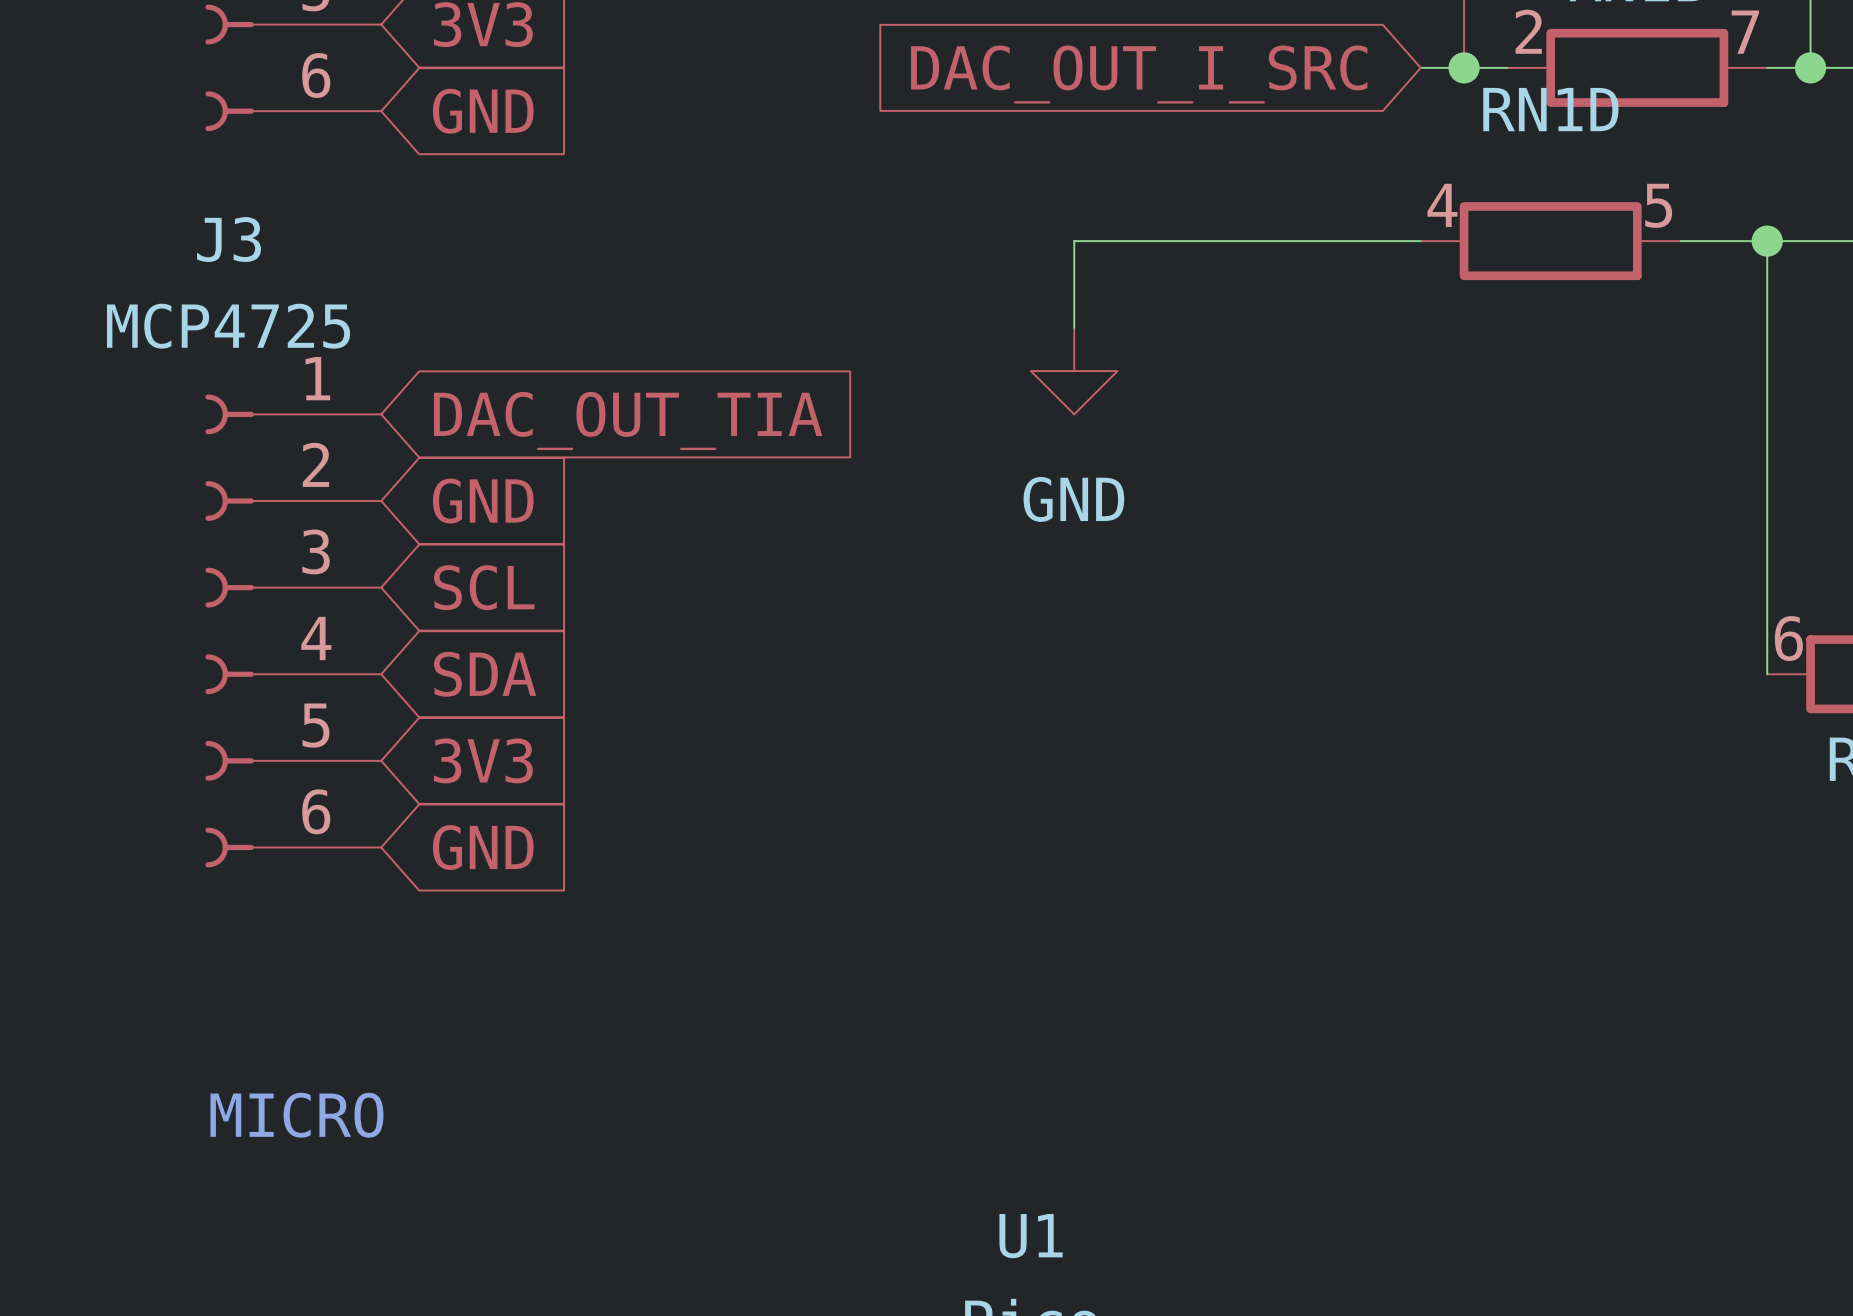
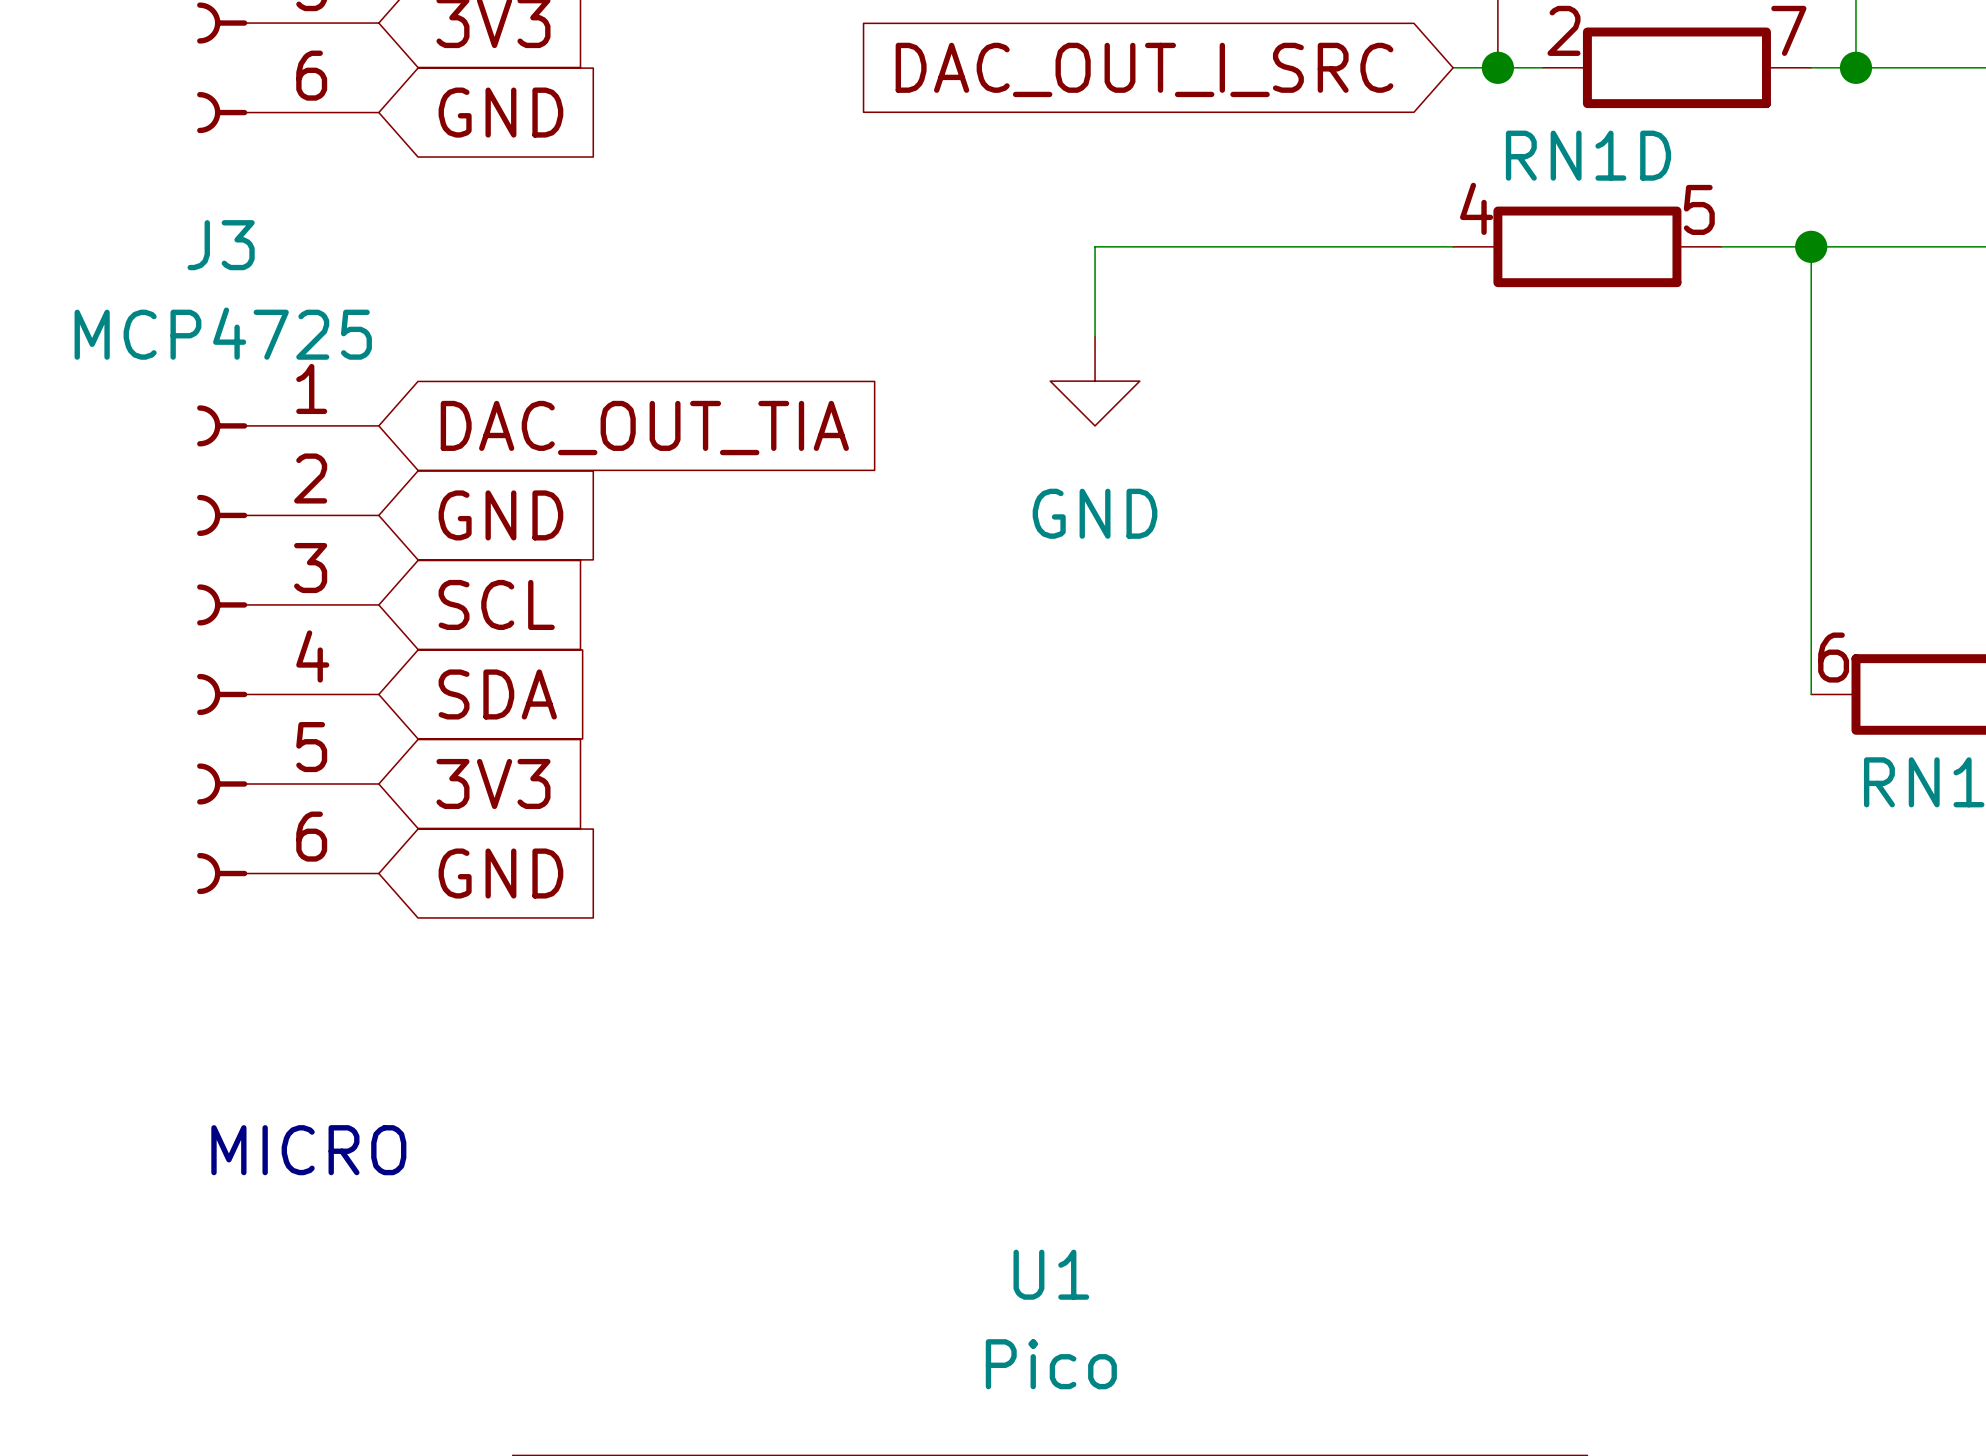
RN1D name position: RN1D (1550, 109) -> RN1D (1588, 155)

